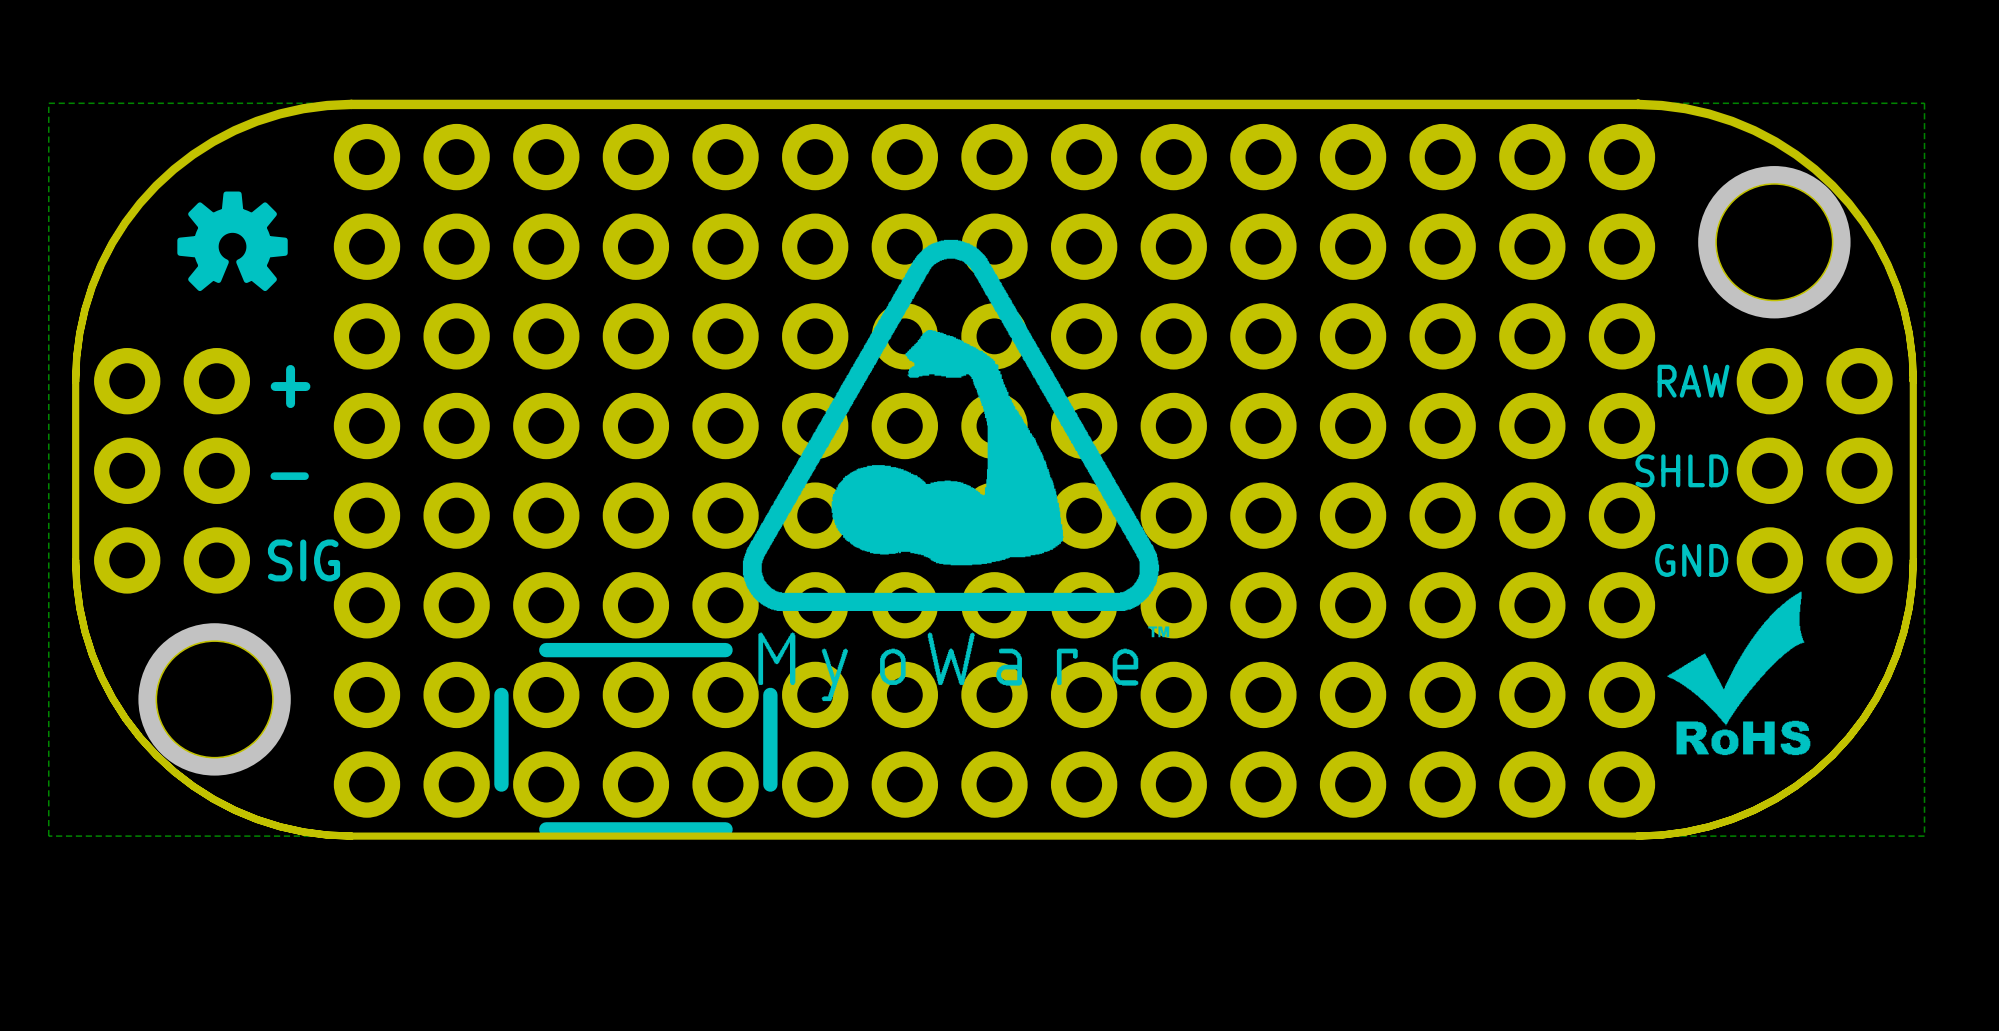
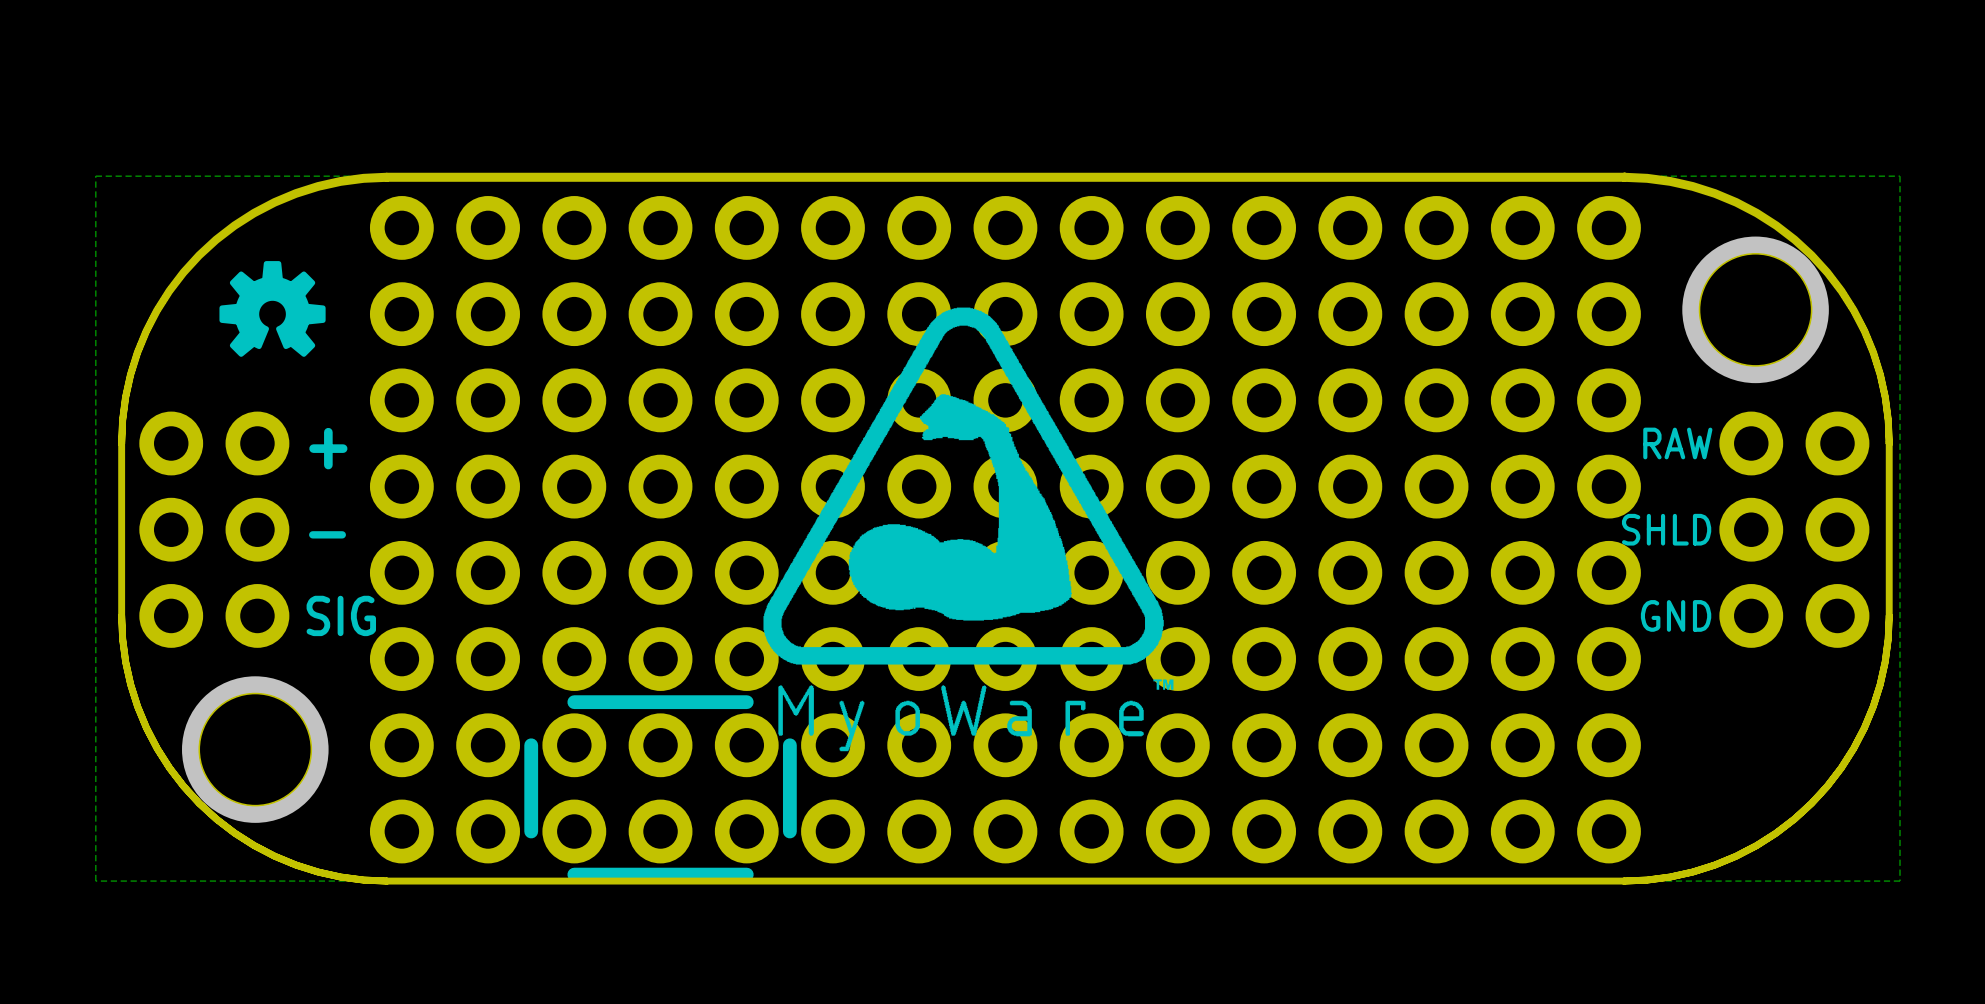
drawing: [1667, 591, 1811, 756] -> none

